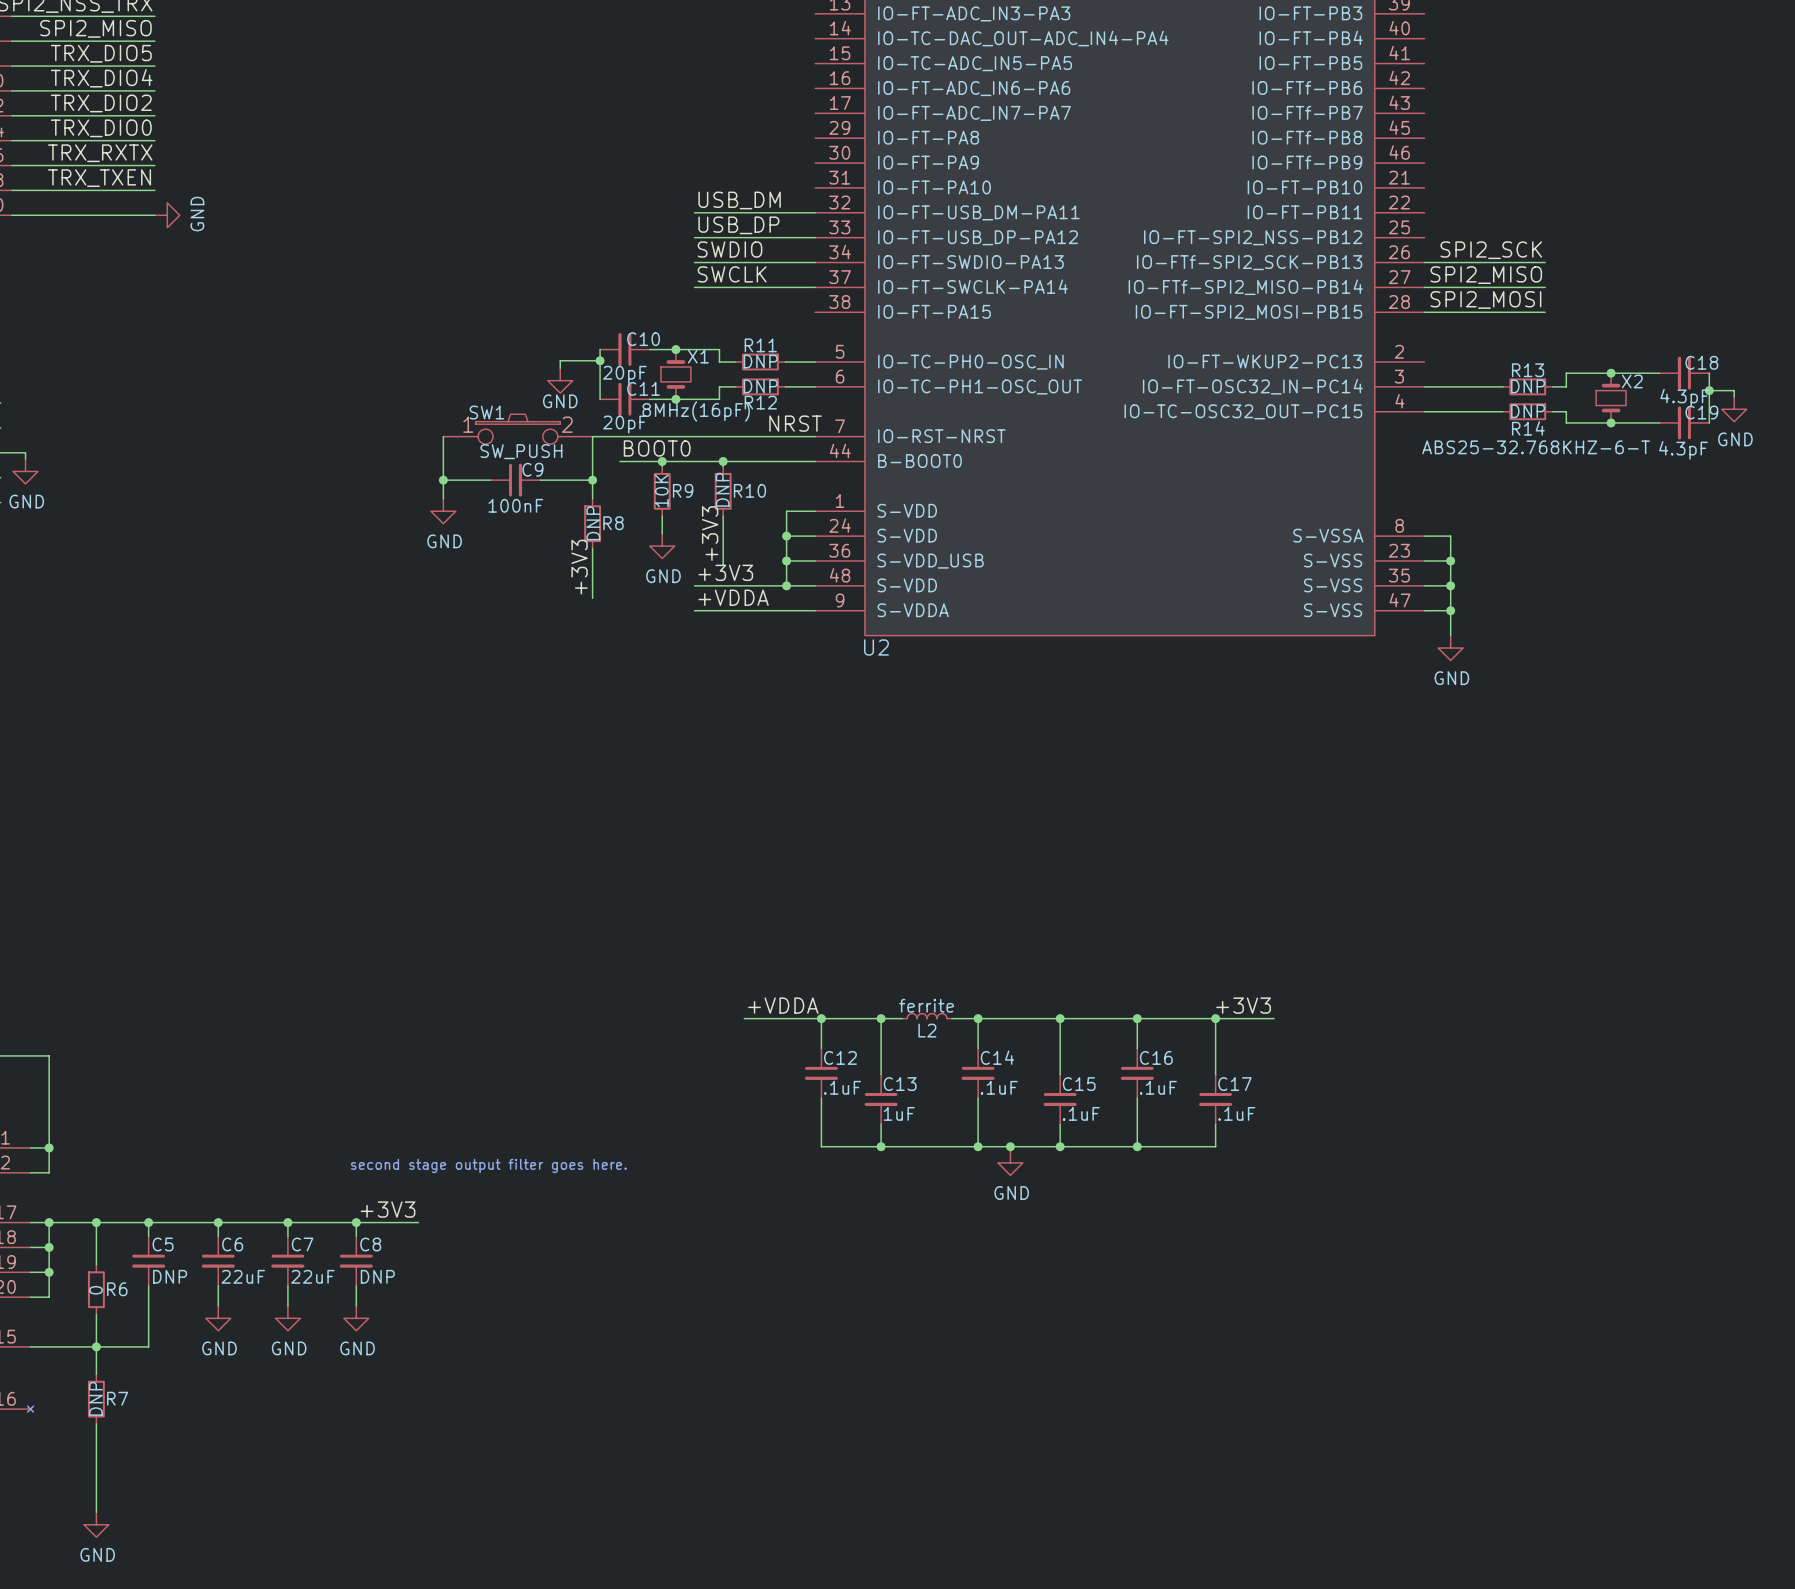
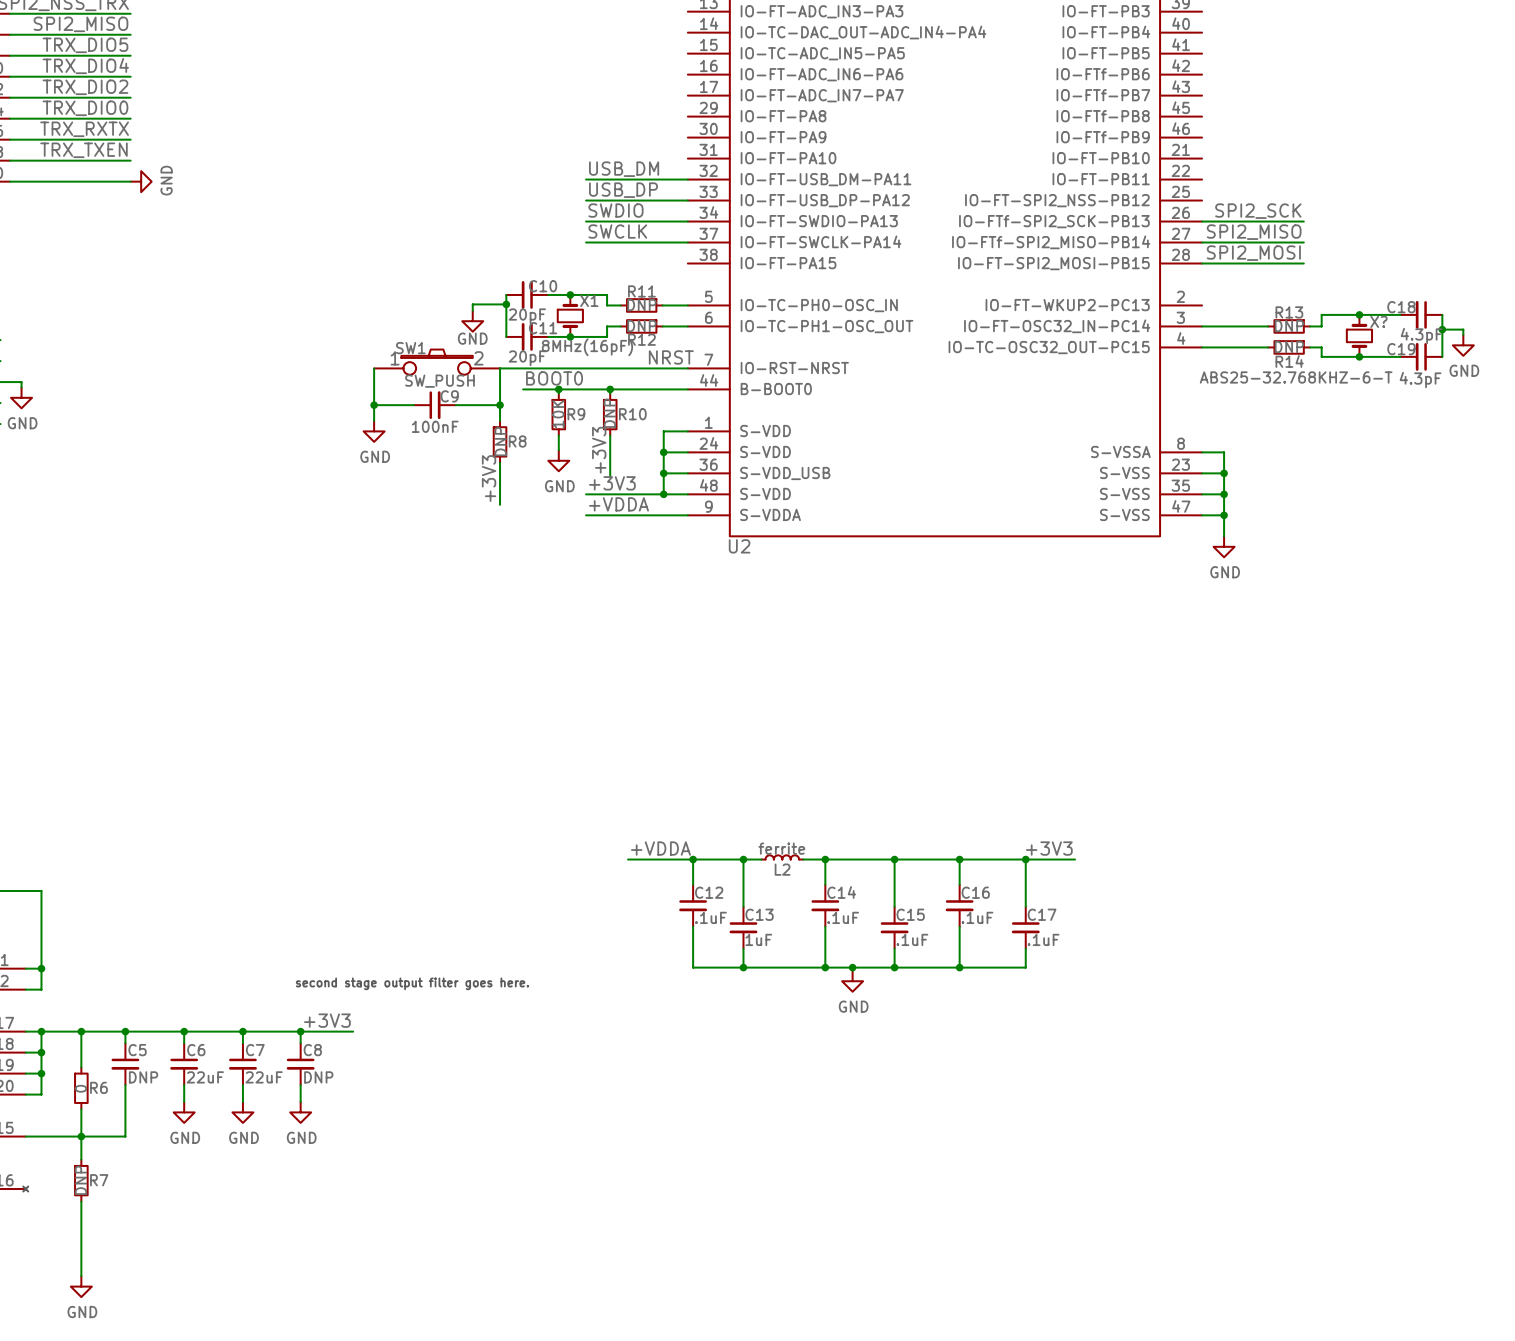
C18 name position: C18 (1701, 362) -> C18 (1401, 307)
X2 name: X2 (1632, 381) -> X? (1378, 321)
C19 name position: C19 (1701, 412) -> C19 (1401, 349)

